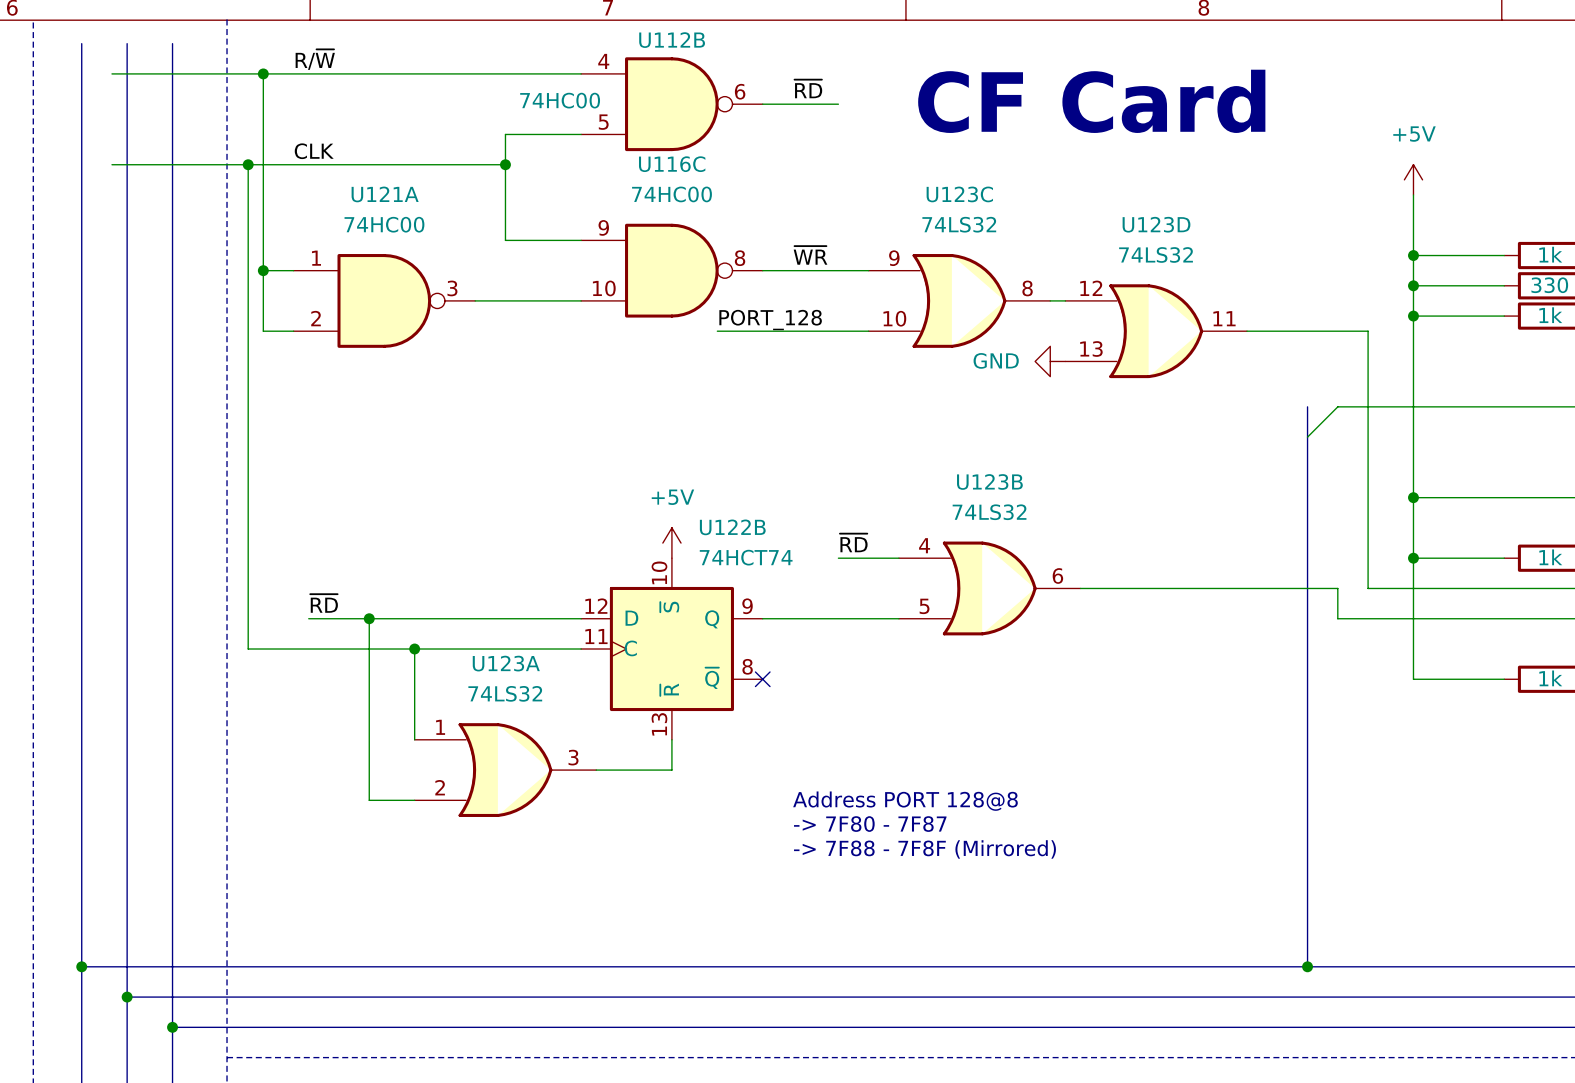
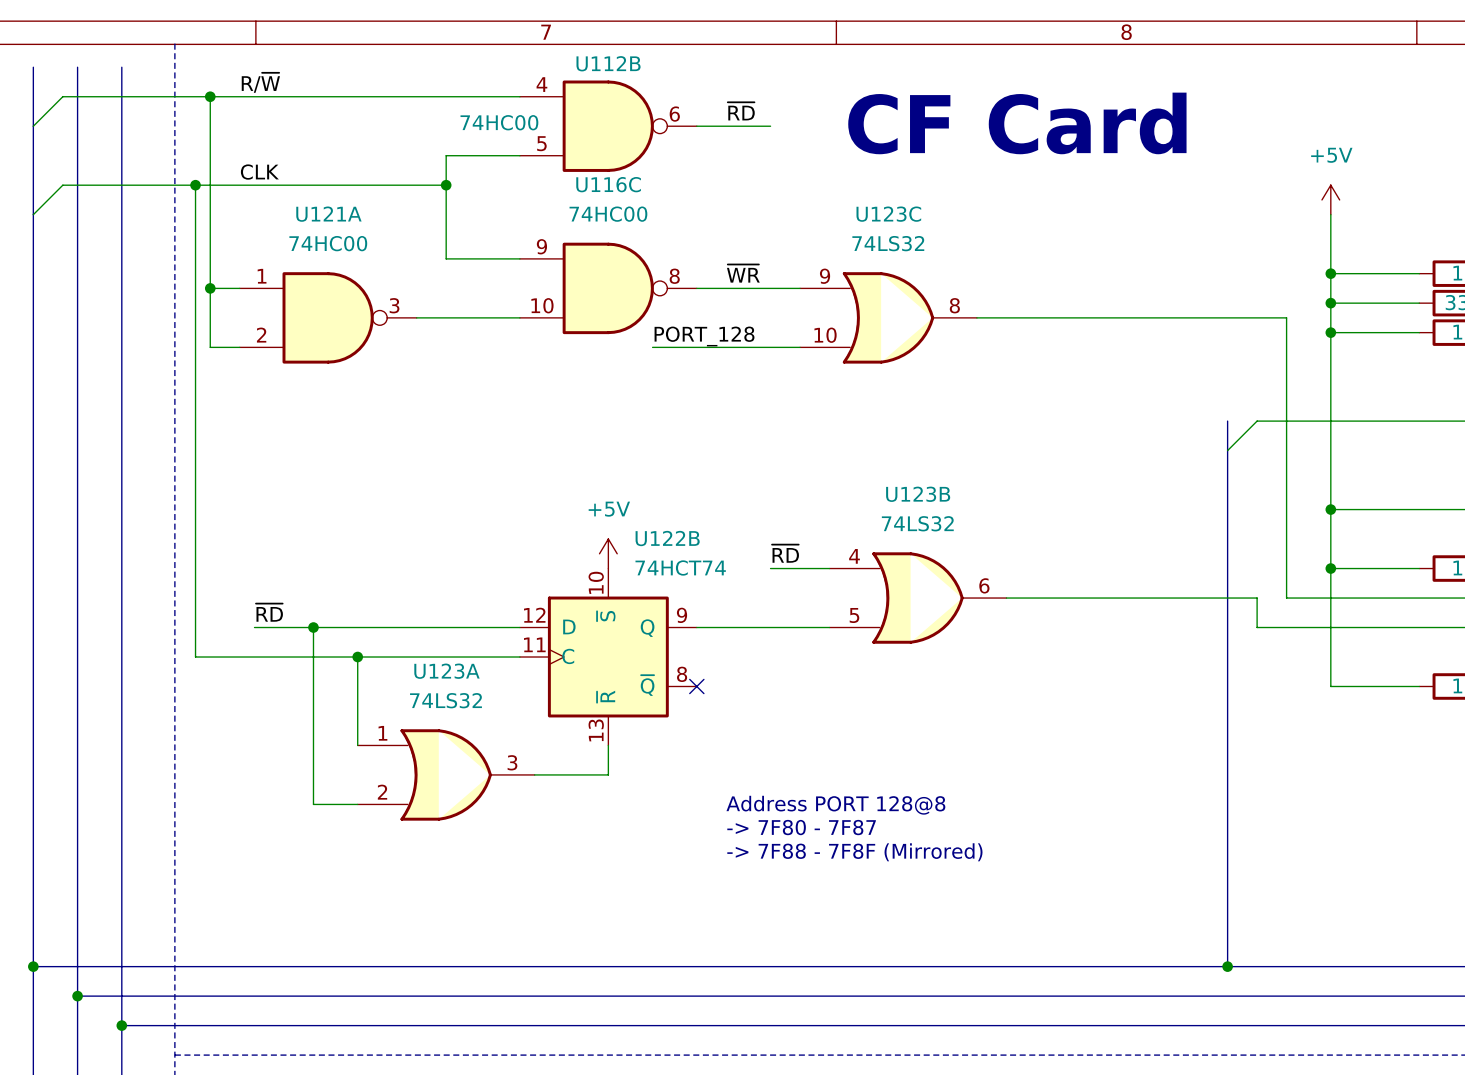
wire: none -> (62, 96) (33, 126)
wire: none -> (62, 185) (33, 214)
U123D: 74LS32 (1156, 331) -> none
wire: (1247, 331) (1368, 331) -> (991, 317) (1286, 317) (1286, 347)
power symbol: GND (1050, 361) -> none

